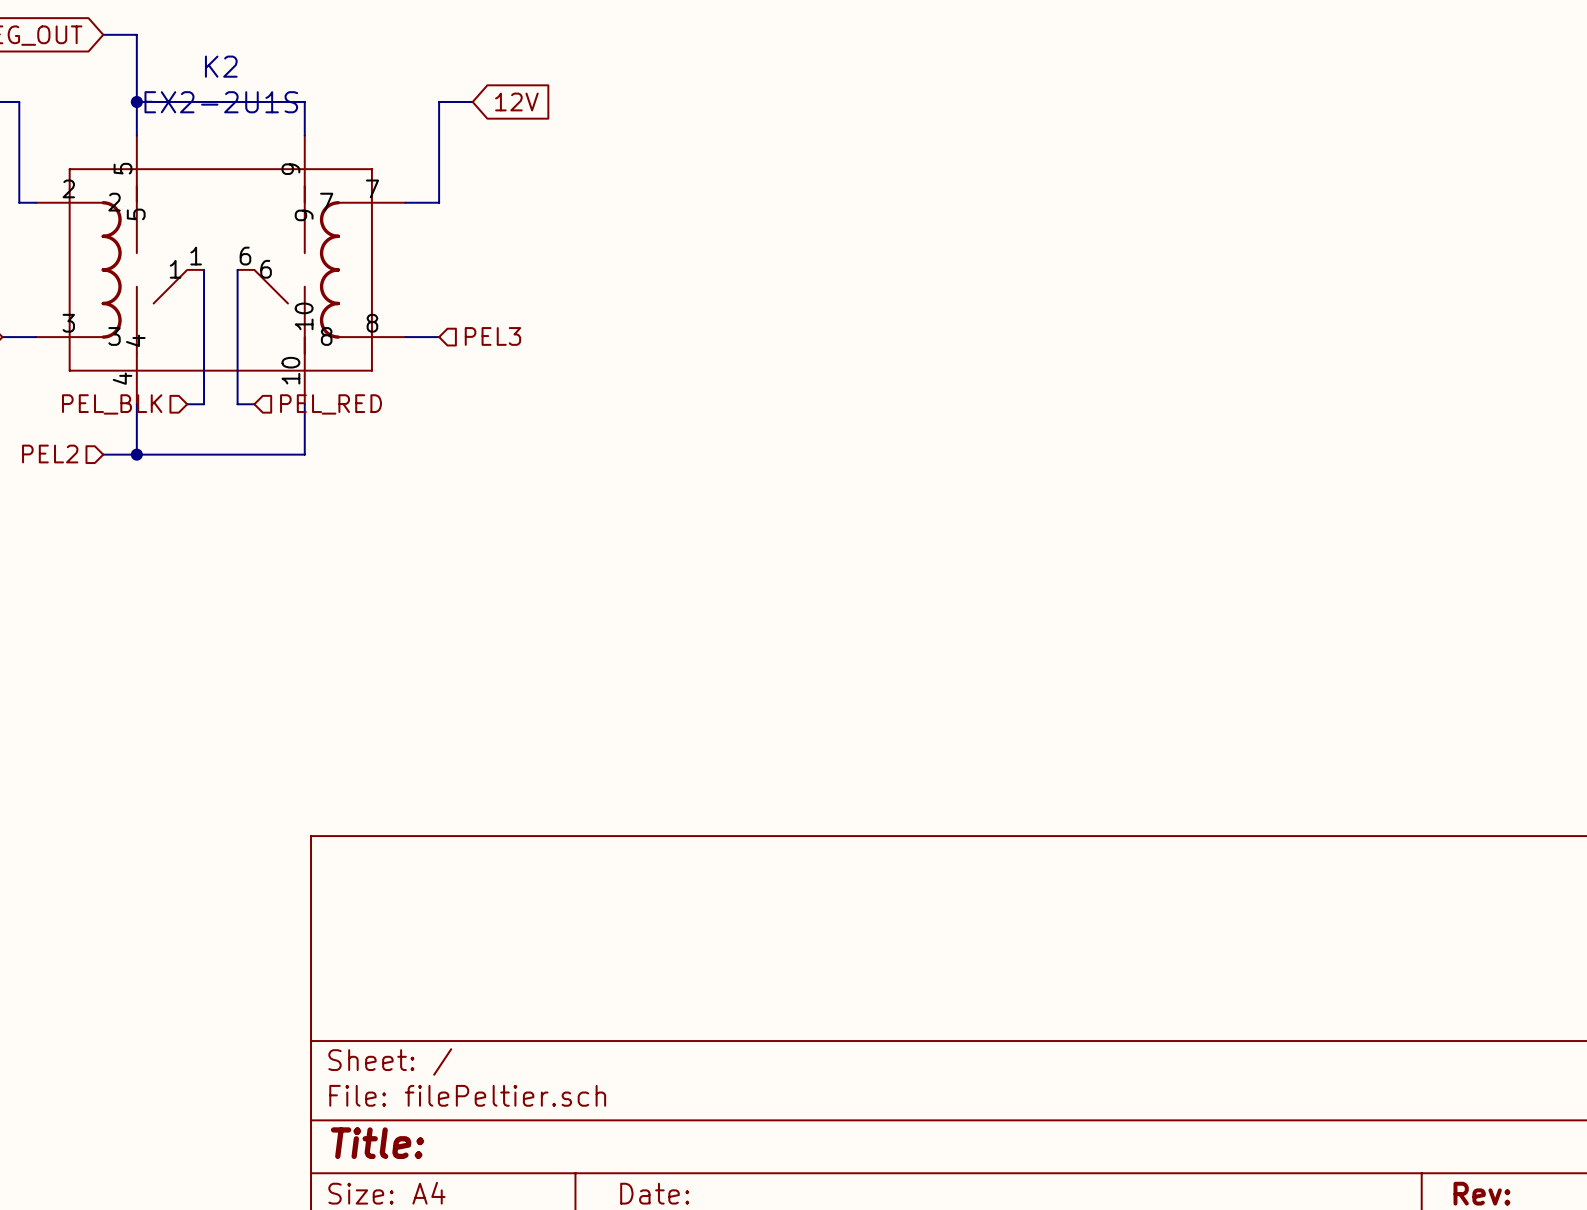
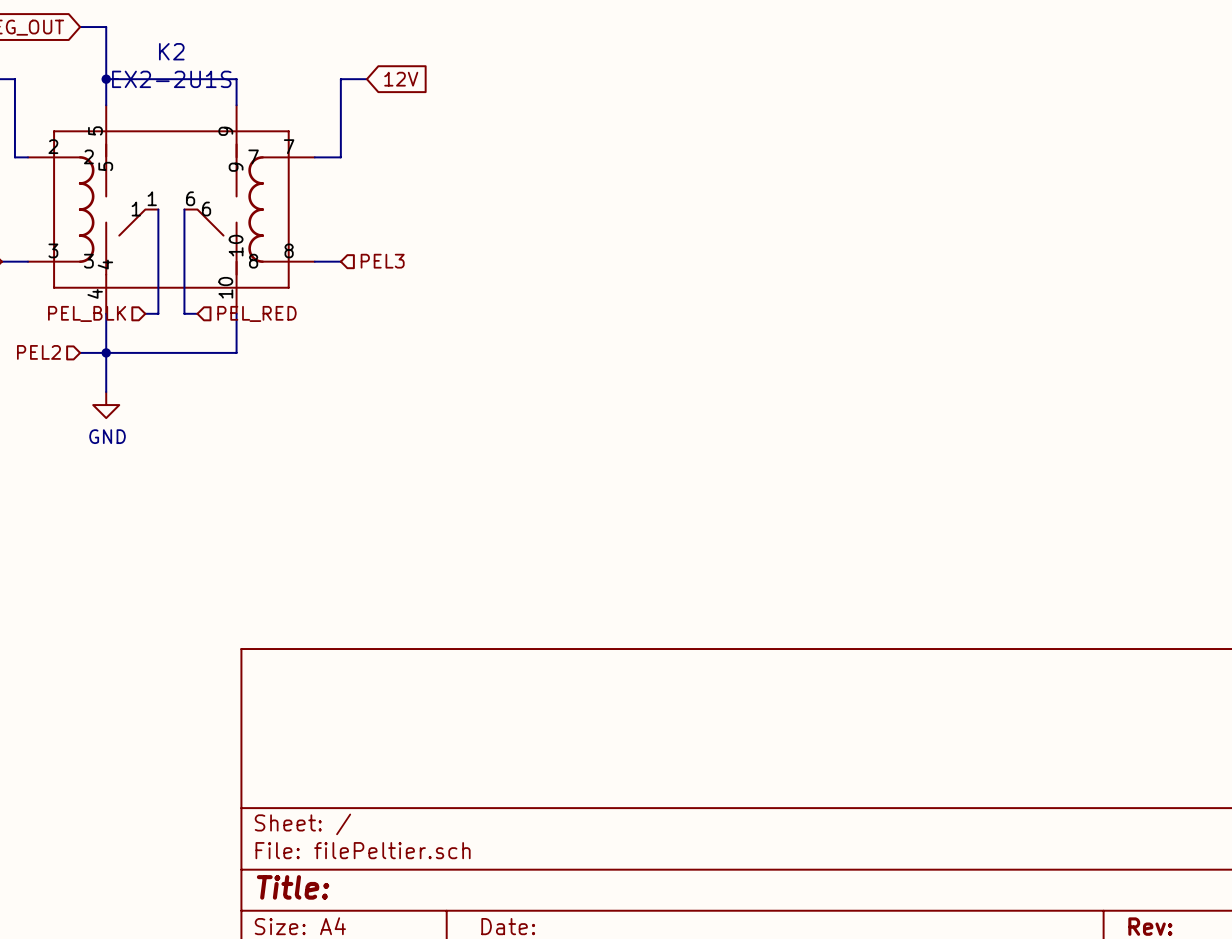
wire: none -> (106, 352) (106, 392)
power symbol: none -> GND (106, 405)

